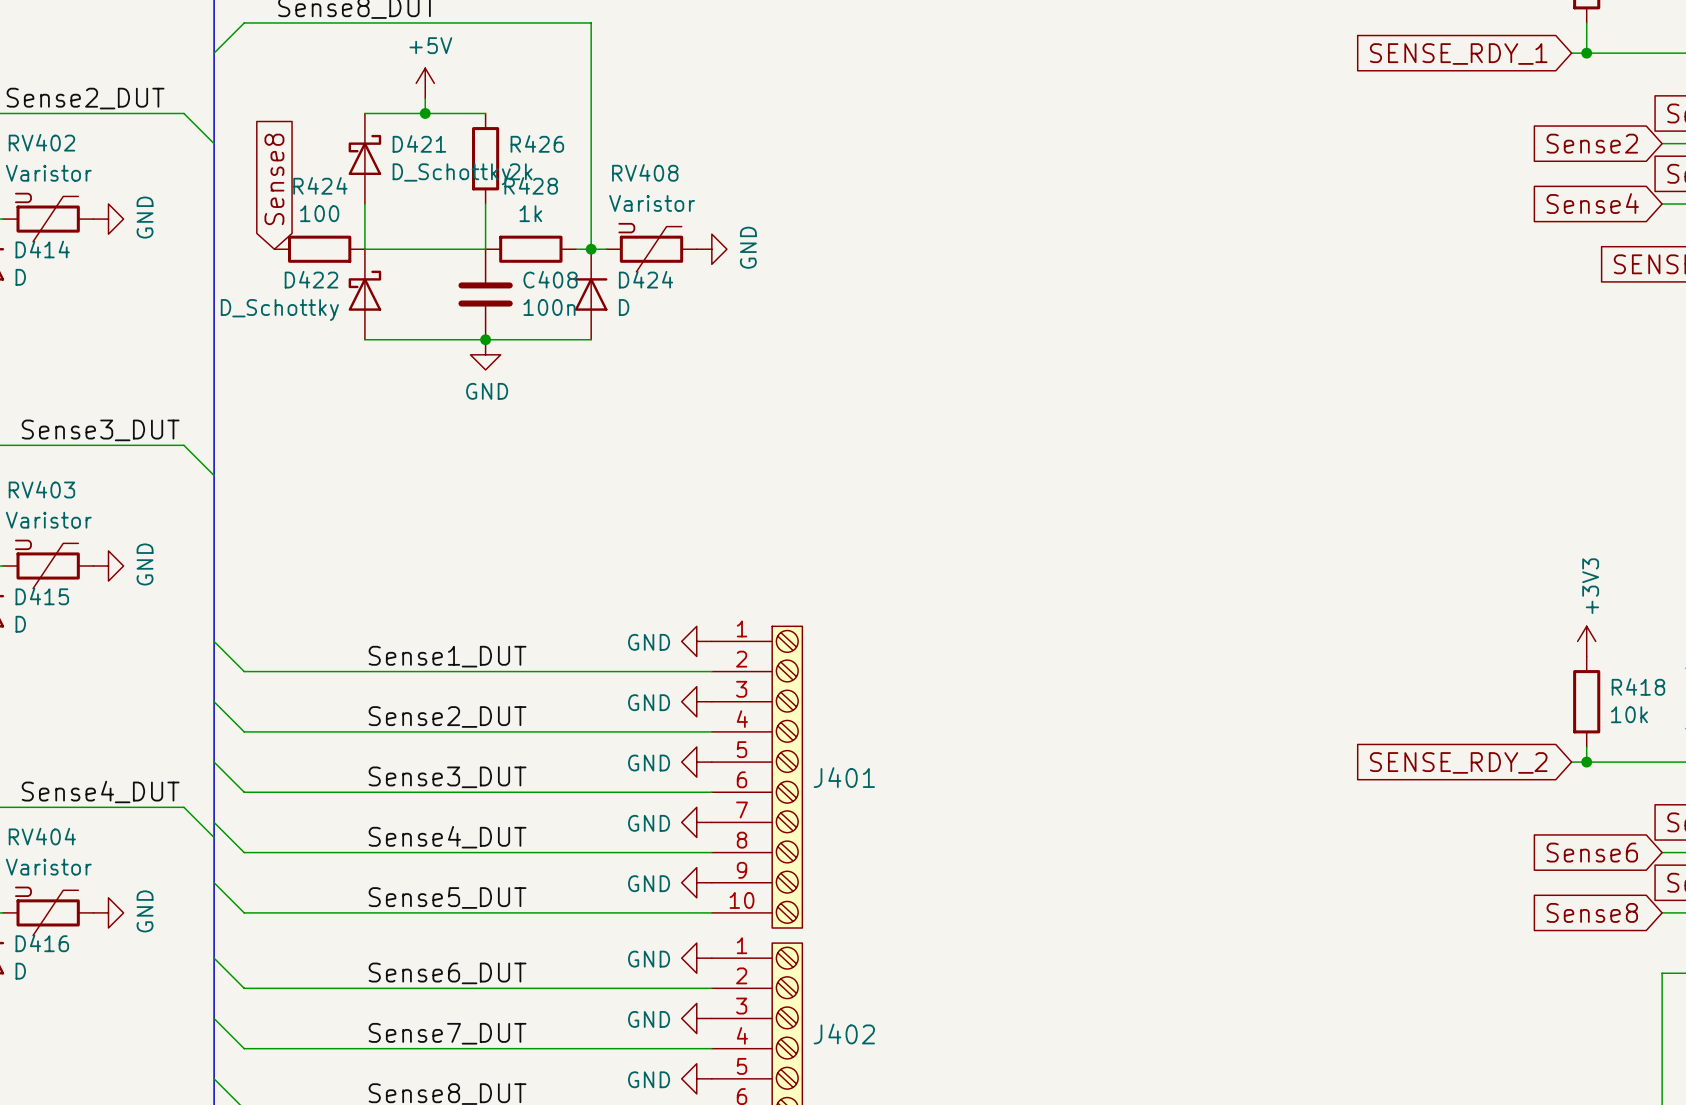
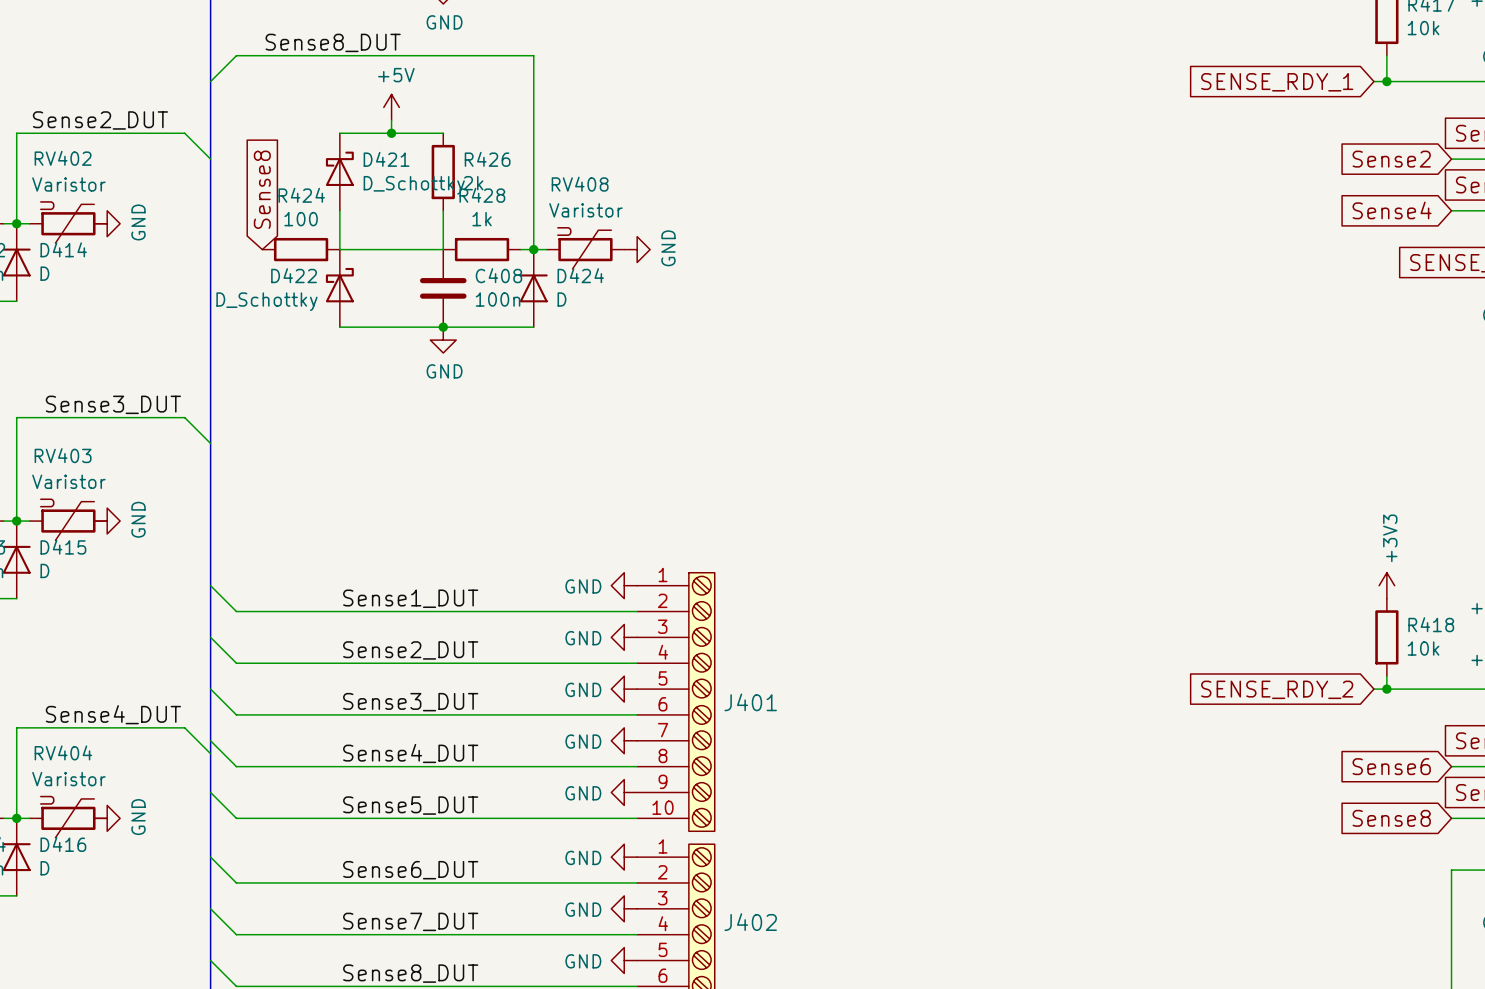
power symbol position: GND (108, 219) -> GND (107, 223)
power symbol position: GND (108, 565) -> GND (107, 521)
power symbol position: GND (108, 912) -> GND (107, 818)

